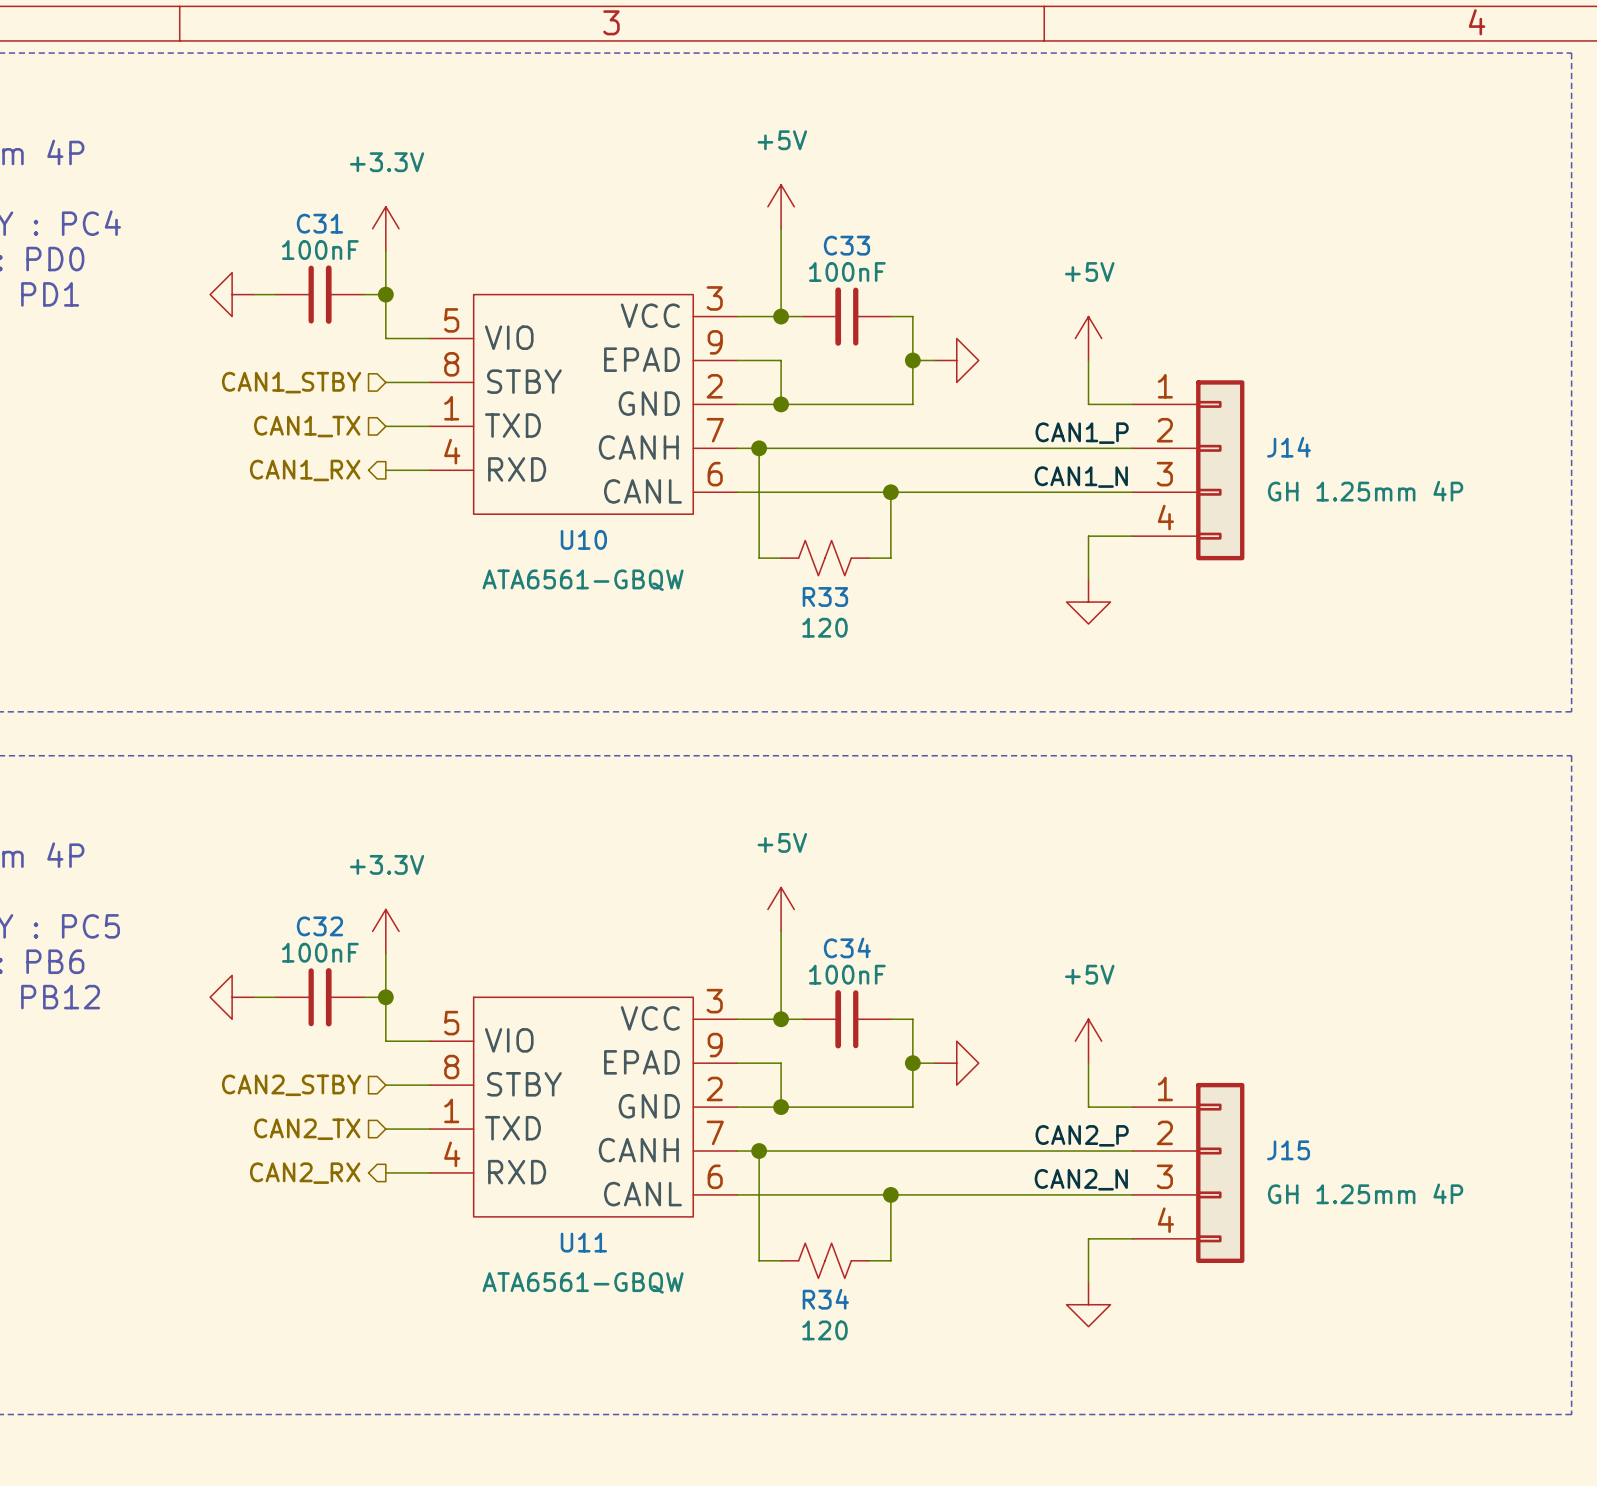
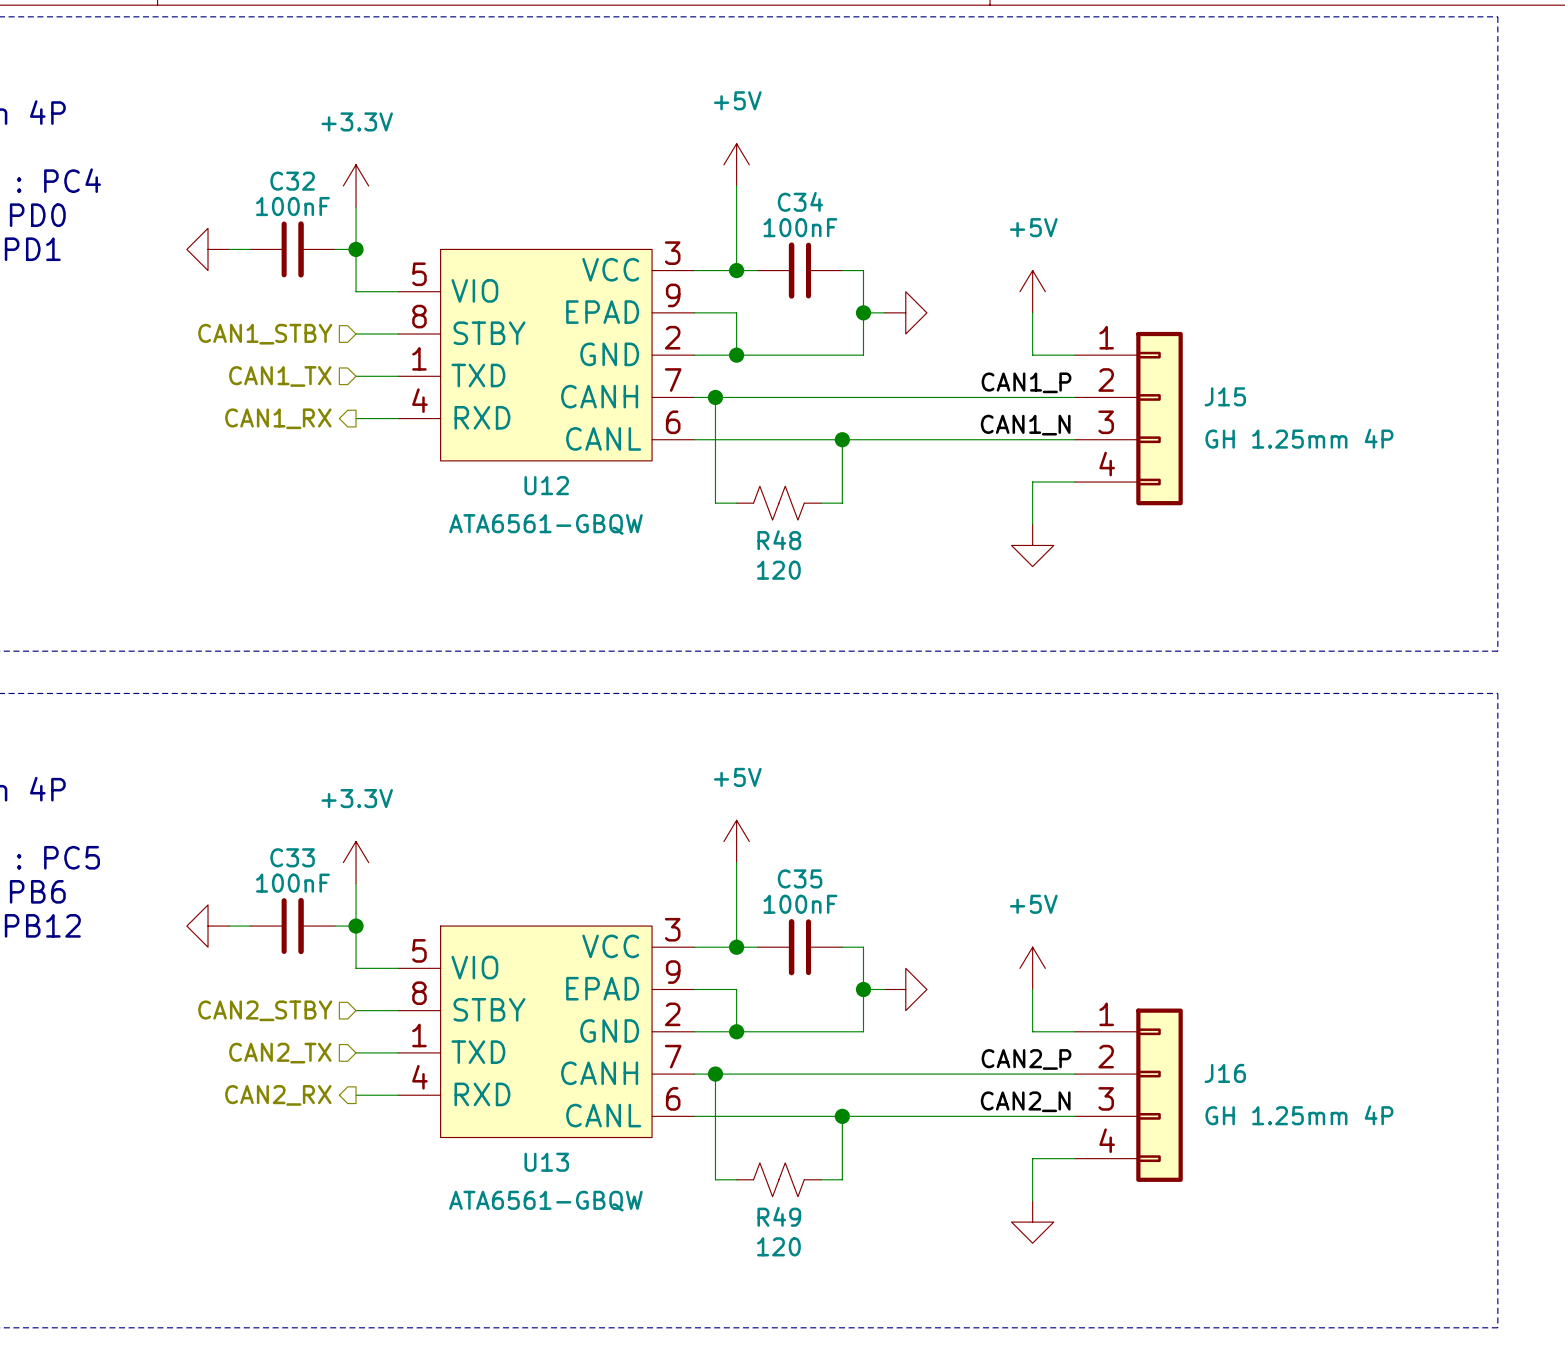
C31 name: C31 (319, 223) -> C32 (292, 181)
C33 name: C33 (846, 245) -> C34 (800, 201)
U10: ATA6561-GBQW (583, 404) -> none
U12: none -> ATA6561-GBQW (546, 355)
J14 name: J14 (1288, 447) -> J15 (1225, 396)
R33 name: R33 (825, 597) -> R48 (779, 540)
C32 name: C32 (319, 926) -> C33 (292, 857)
C34 name: C34 (847, 947) -> C35 (800, 878)
U11: ATA6561-GBQW (583, 1107) -> none
U13: none -> ATA6561-GBQW (546, 1031)
J15 name: J15 (1288, 1150) -> J16 (1225, 1073)
R34 name: R34 (825, 1299) -> R49 (779, 1216)

